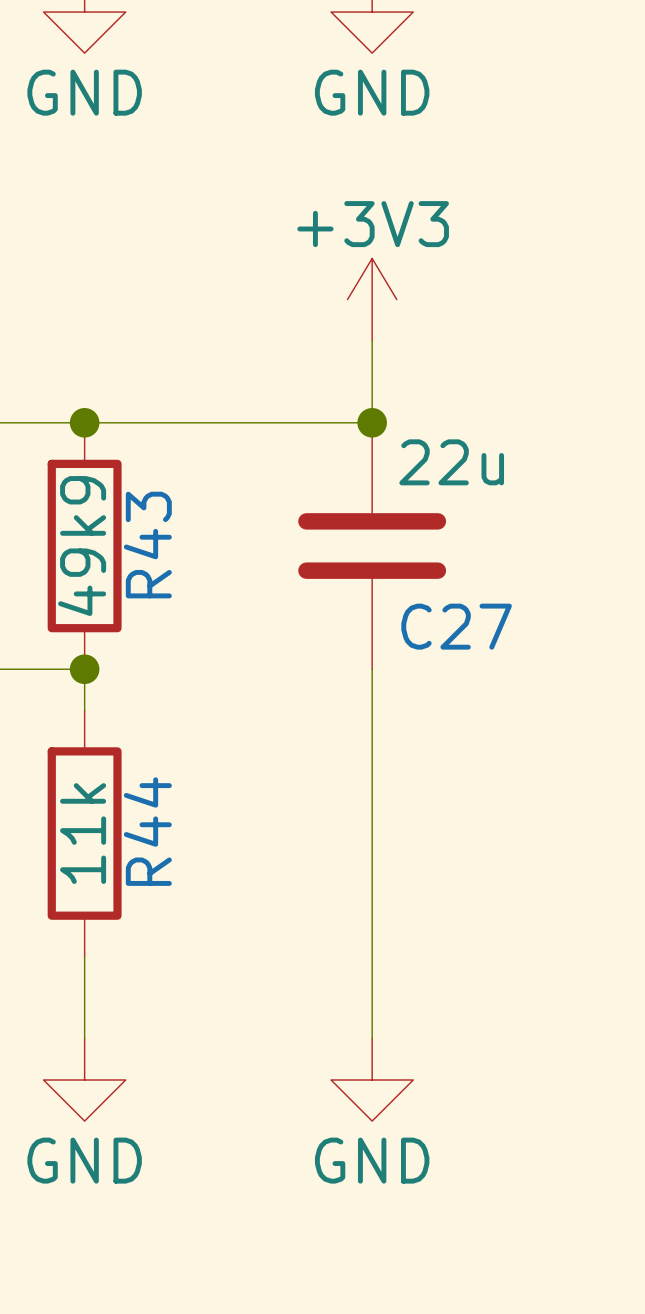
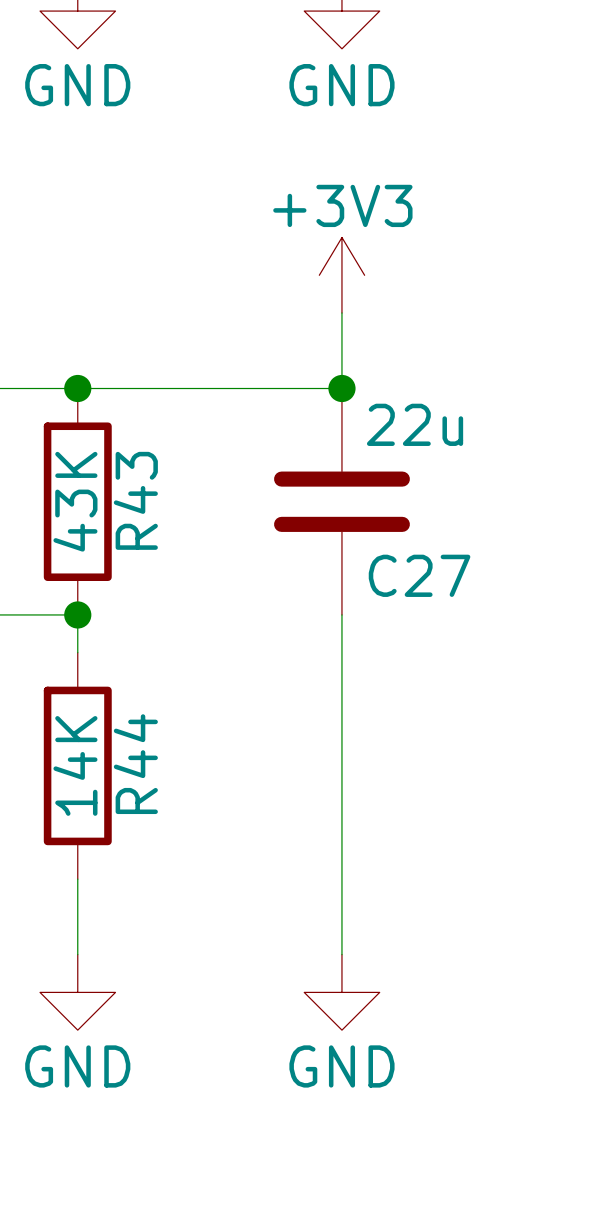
R43 value: 49k9 (82, 546) -> 43K (75, 501)
R44 value: 11k (83, 833) -> 14K (75, 765)

